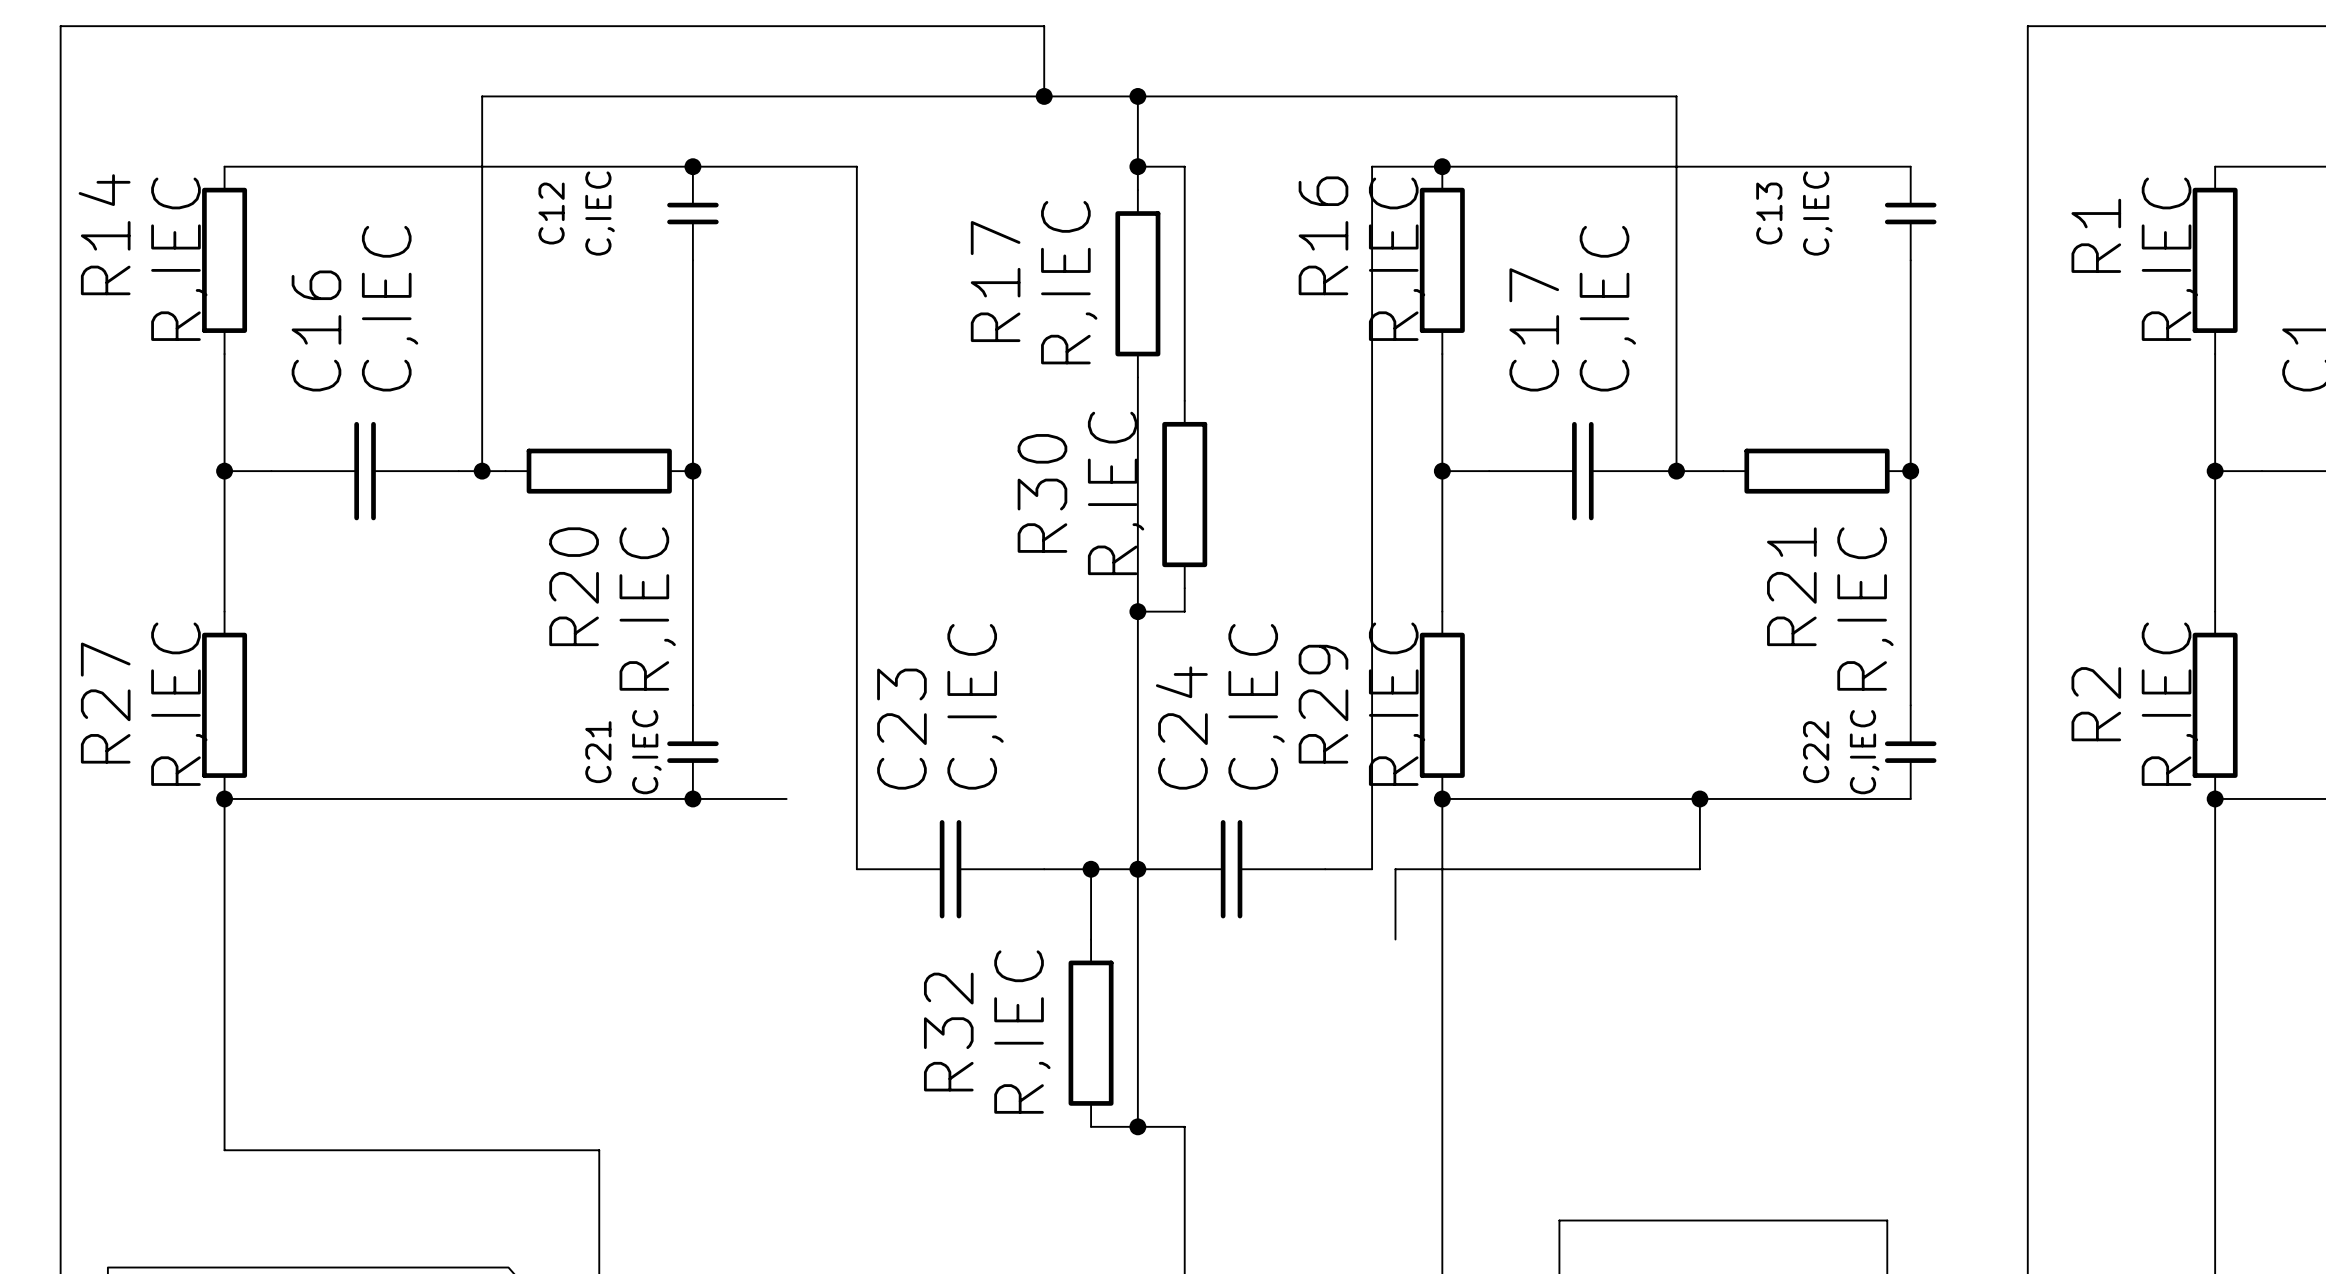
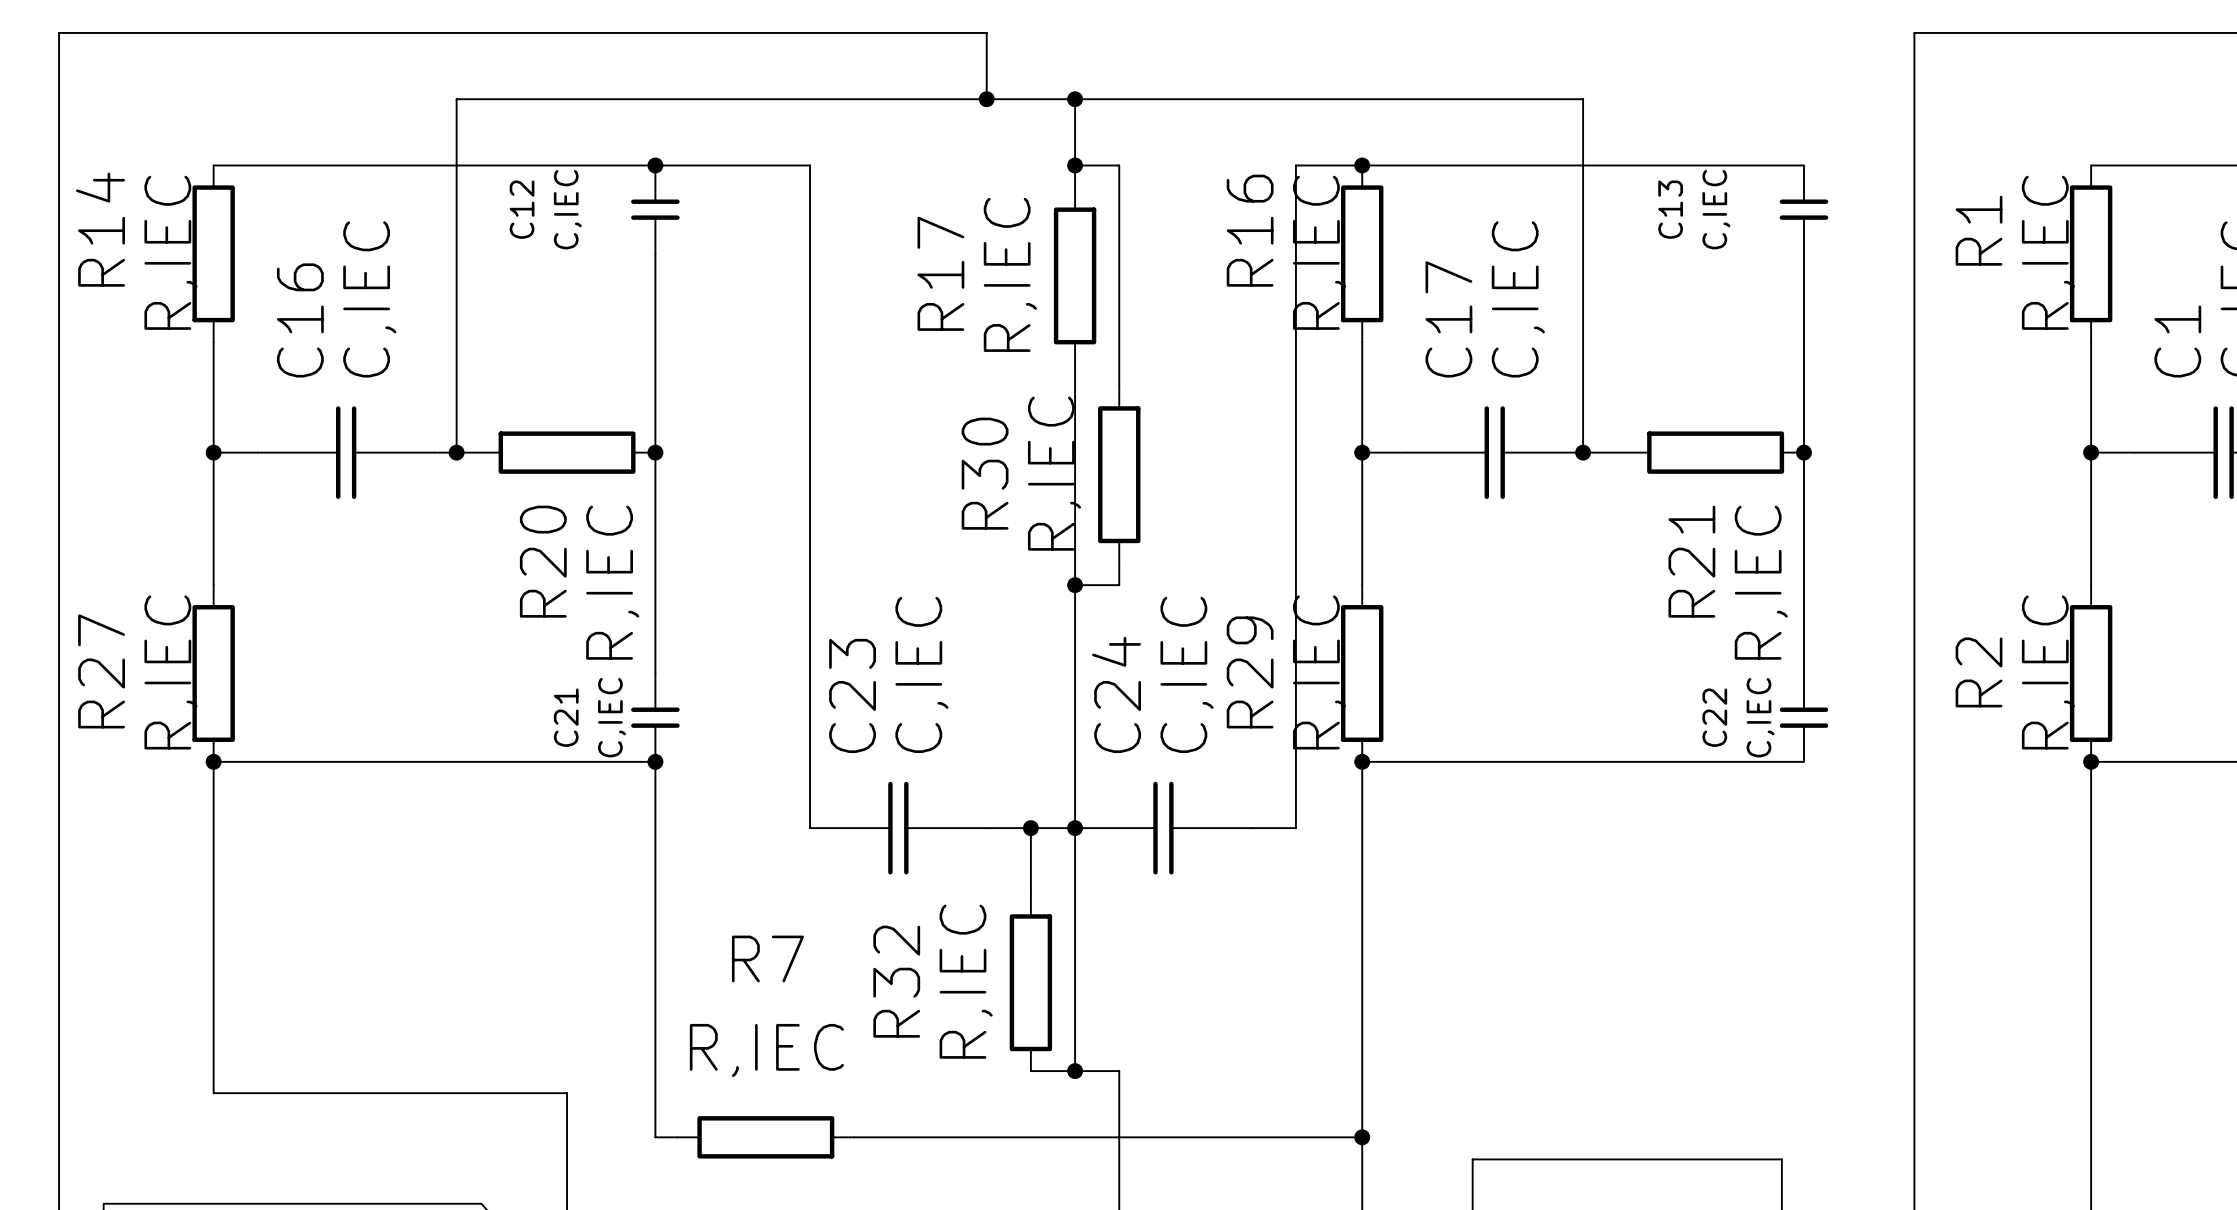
wire: (692, 798) (786, 798) -> (655, 761) (655, 1137) (677, 1137)
wire: (1699, 798) (1699, 869) (1395, 869) (1395, 939) -> none
junction: (1699, 798) -> none
R7: none -> R,IEC (765, 1137)
wire: none -> (854, 1137) (1362, 1137)
junction: none -> (1362, 1137)

